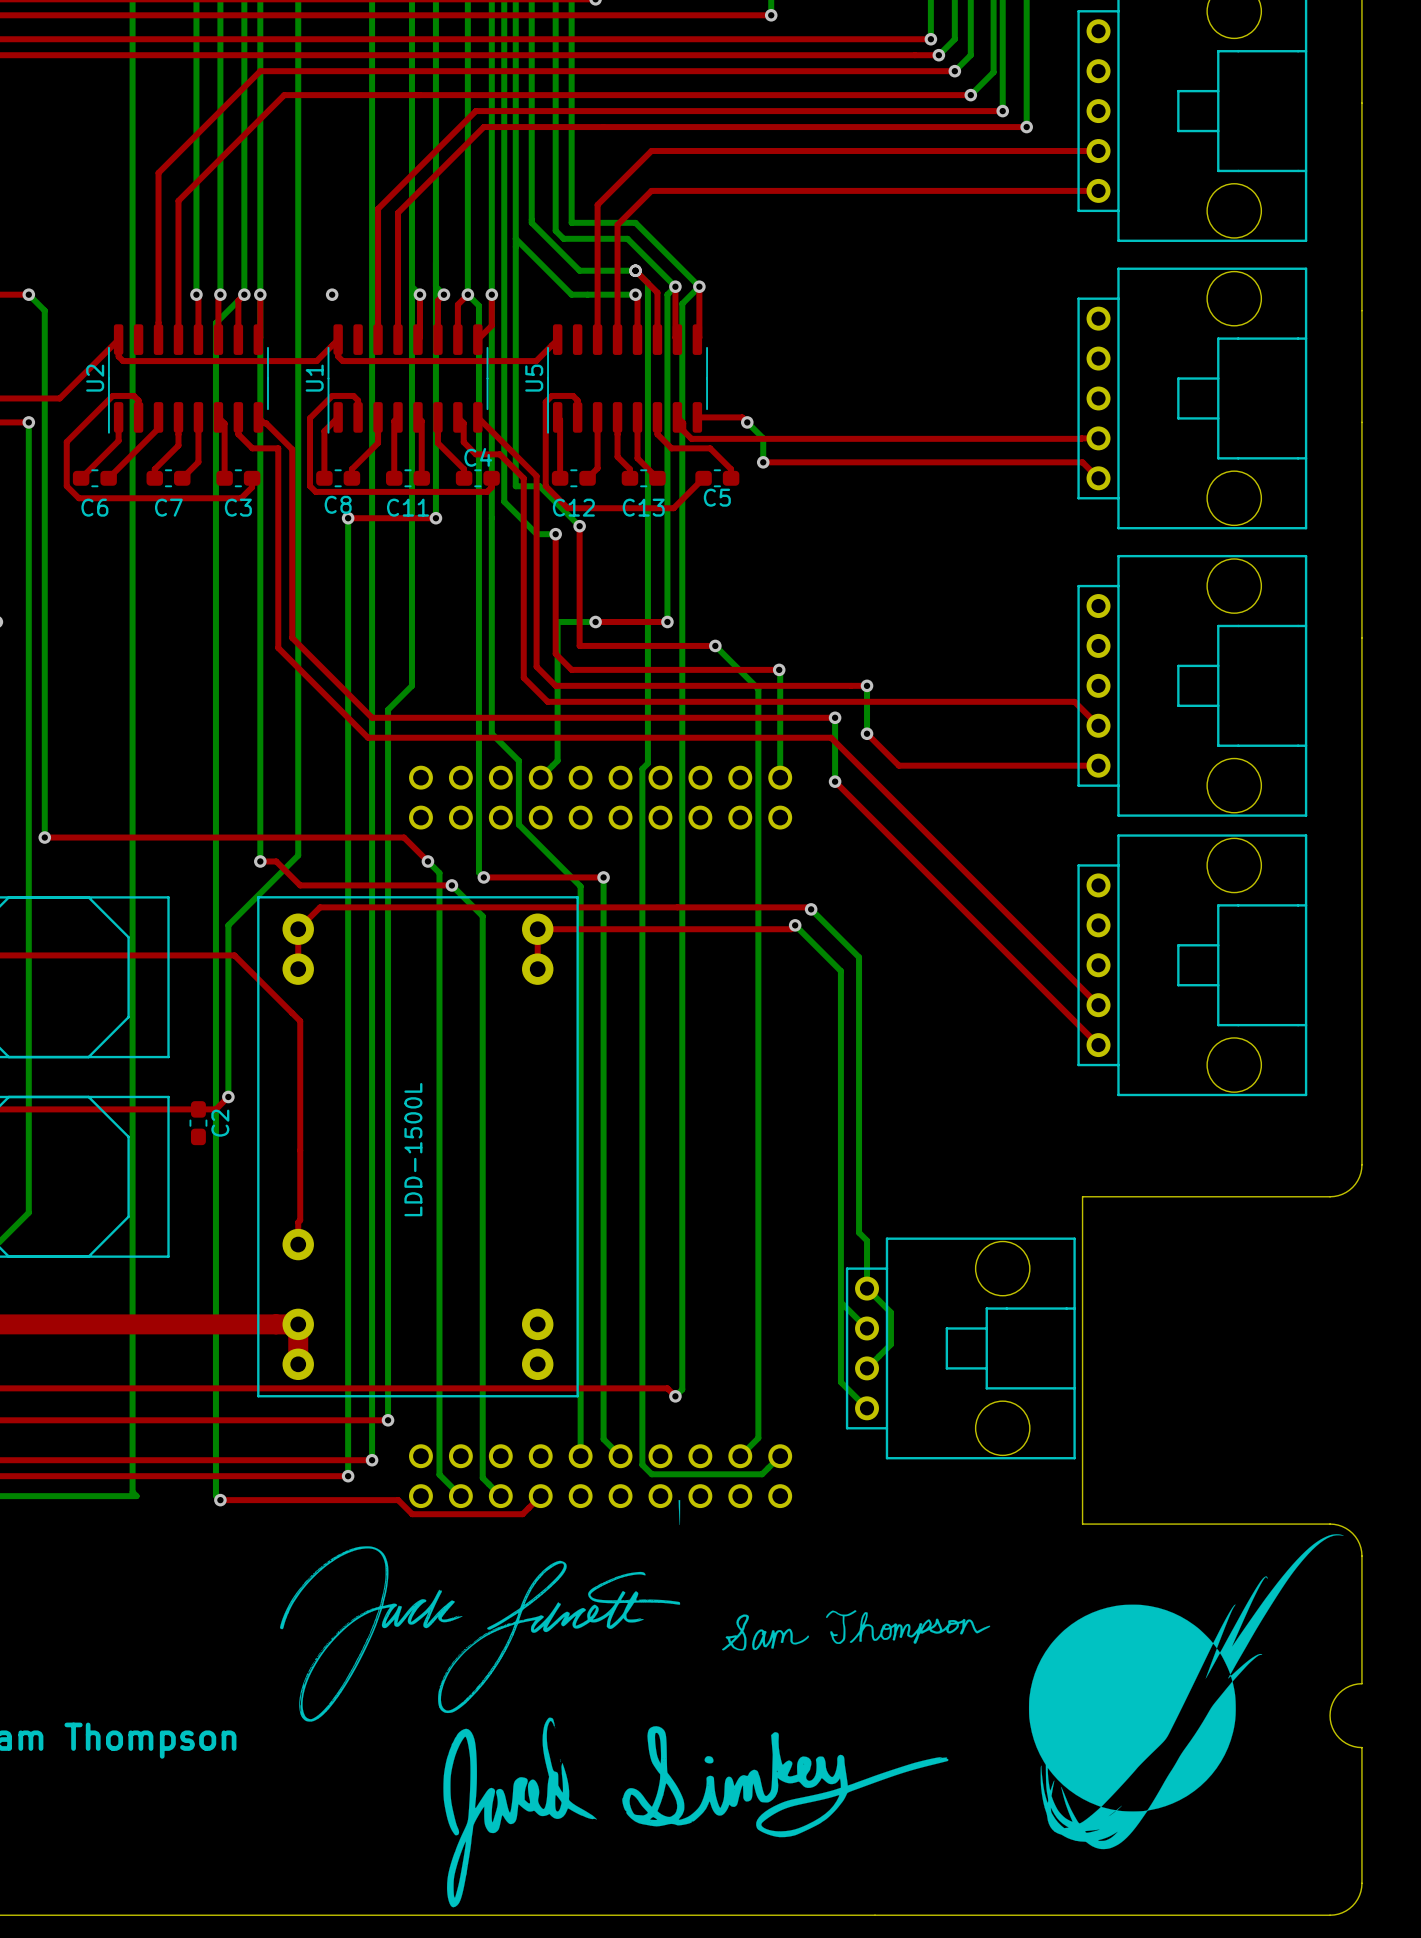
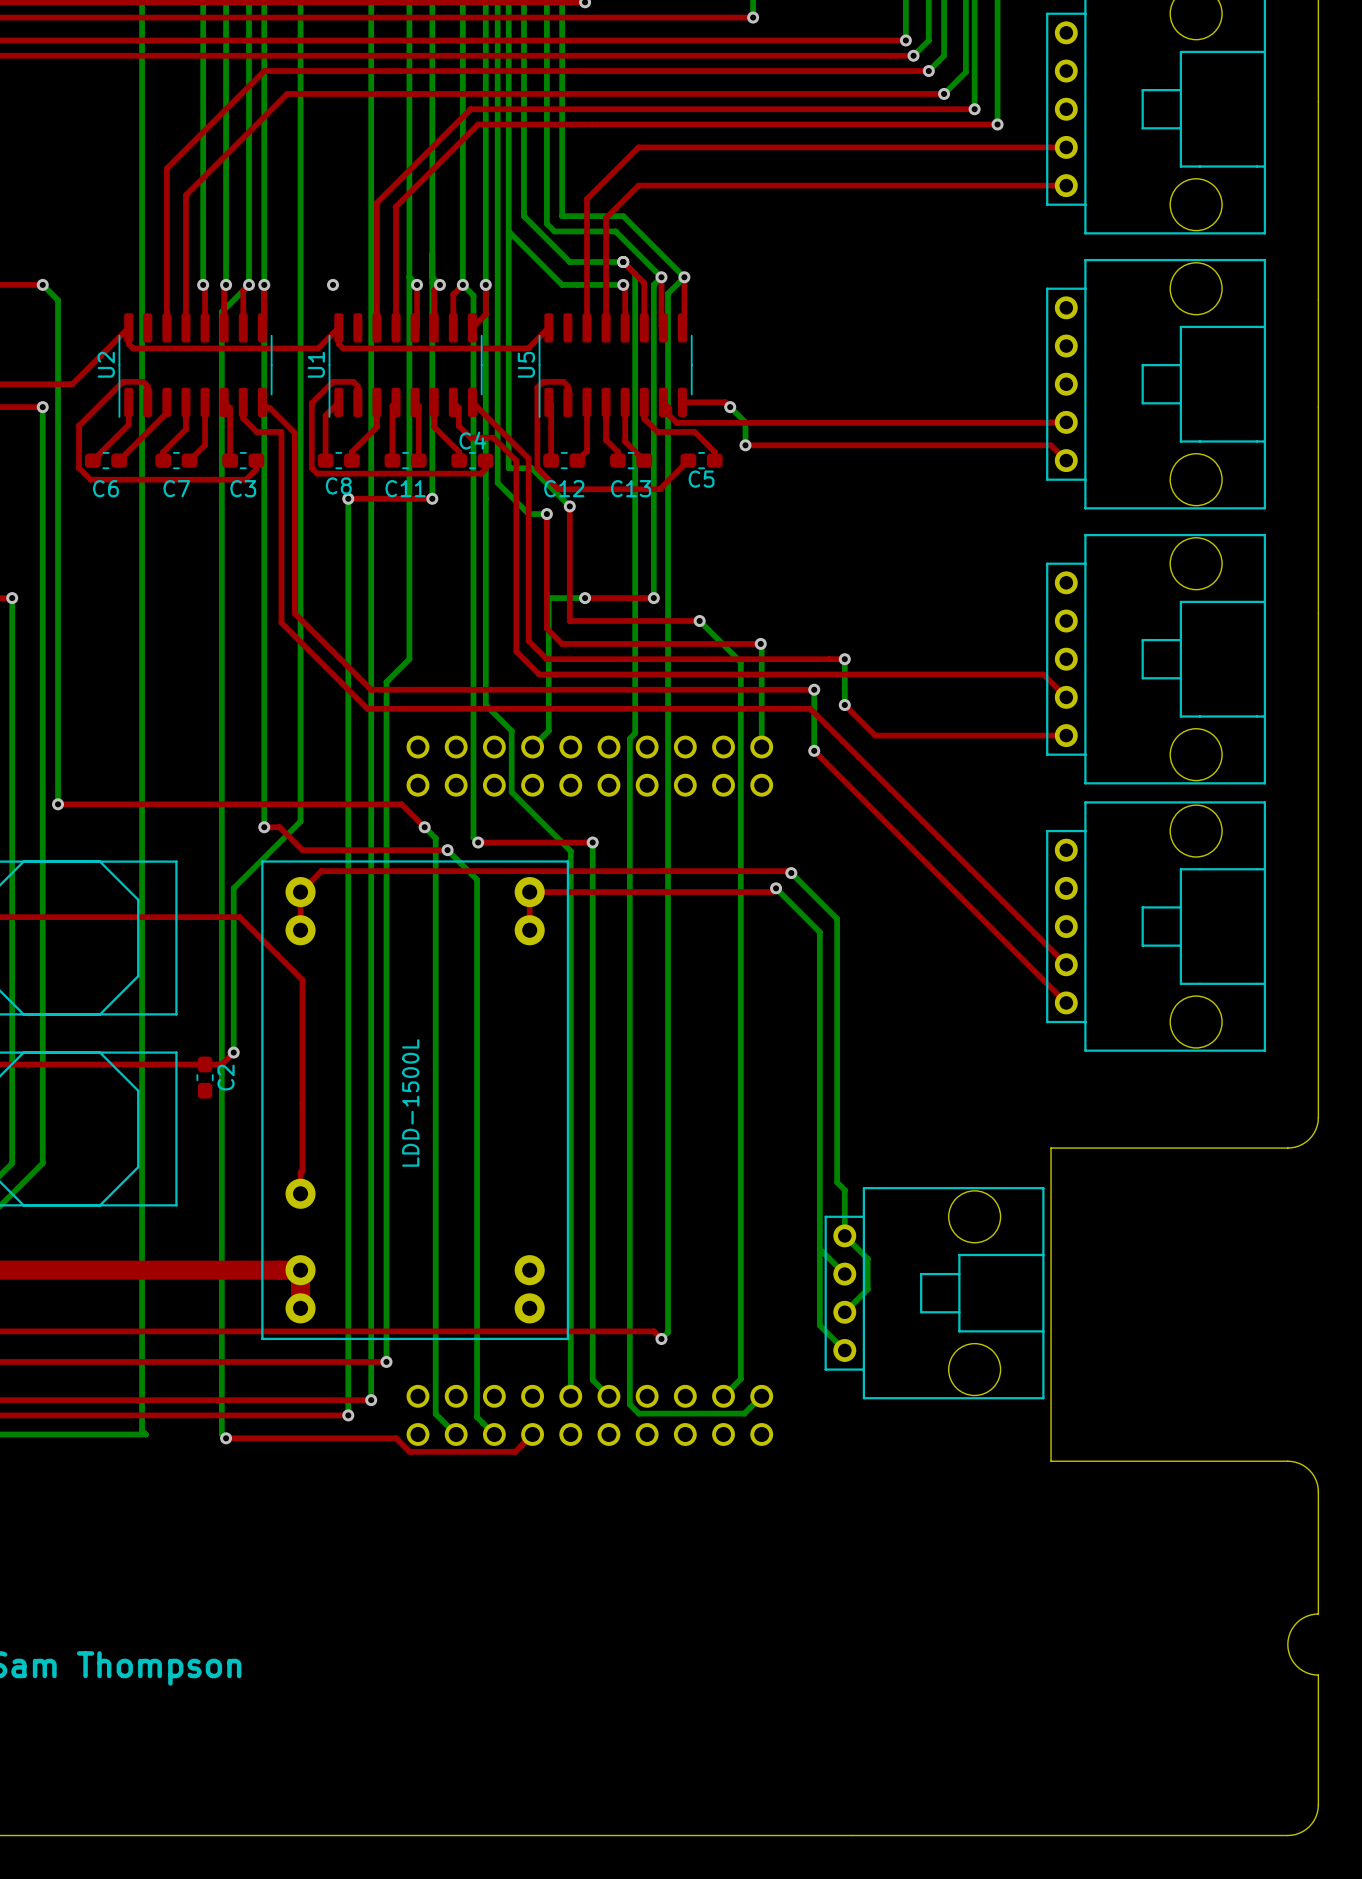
drawing: [280, 1500, 949, 1908] -> none
drawing: [1028, 1534, 1344, 1850] -> none
drawing: [721, 1610, 991, 1651] -> none

